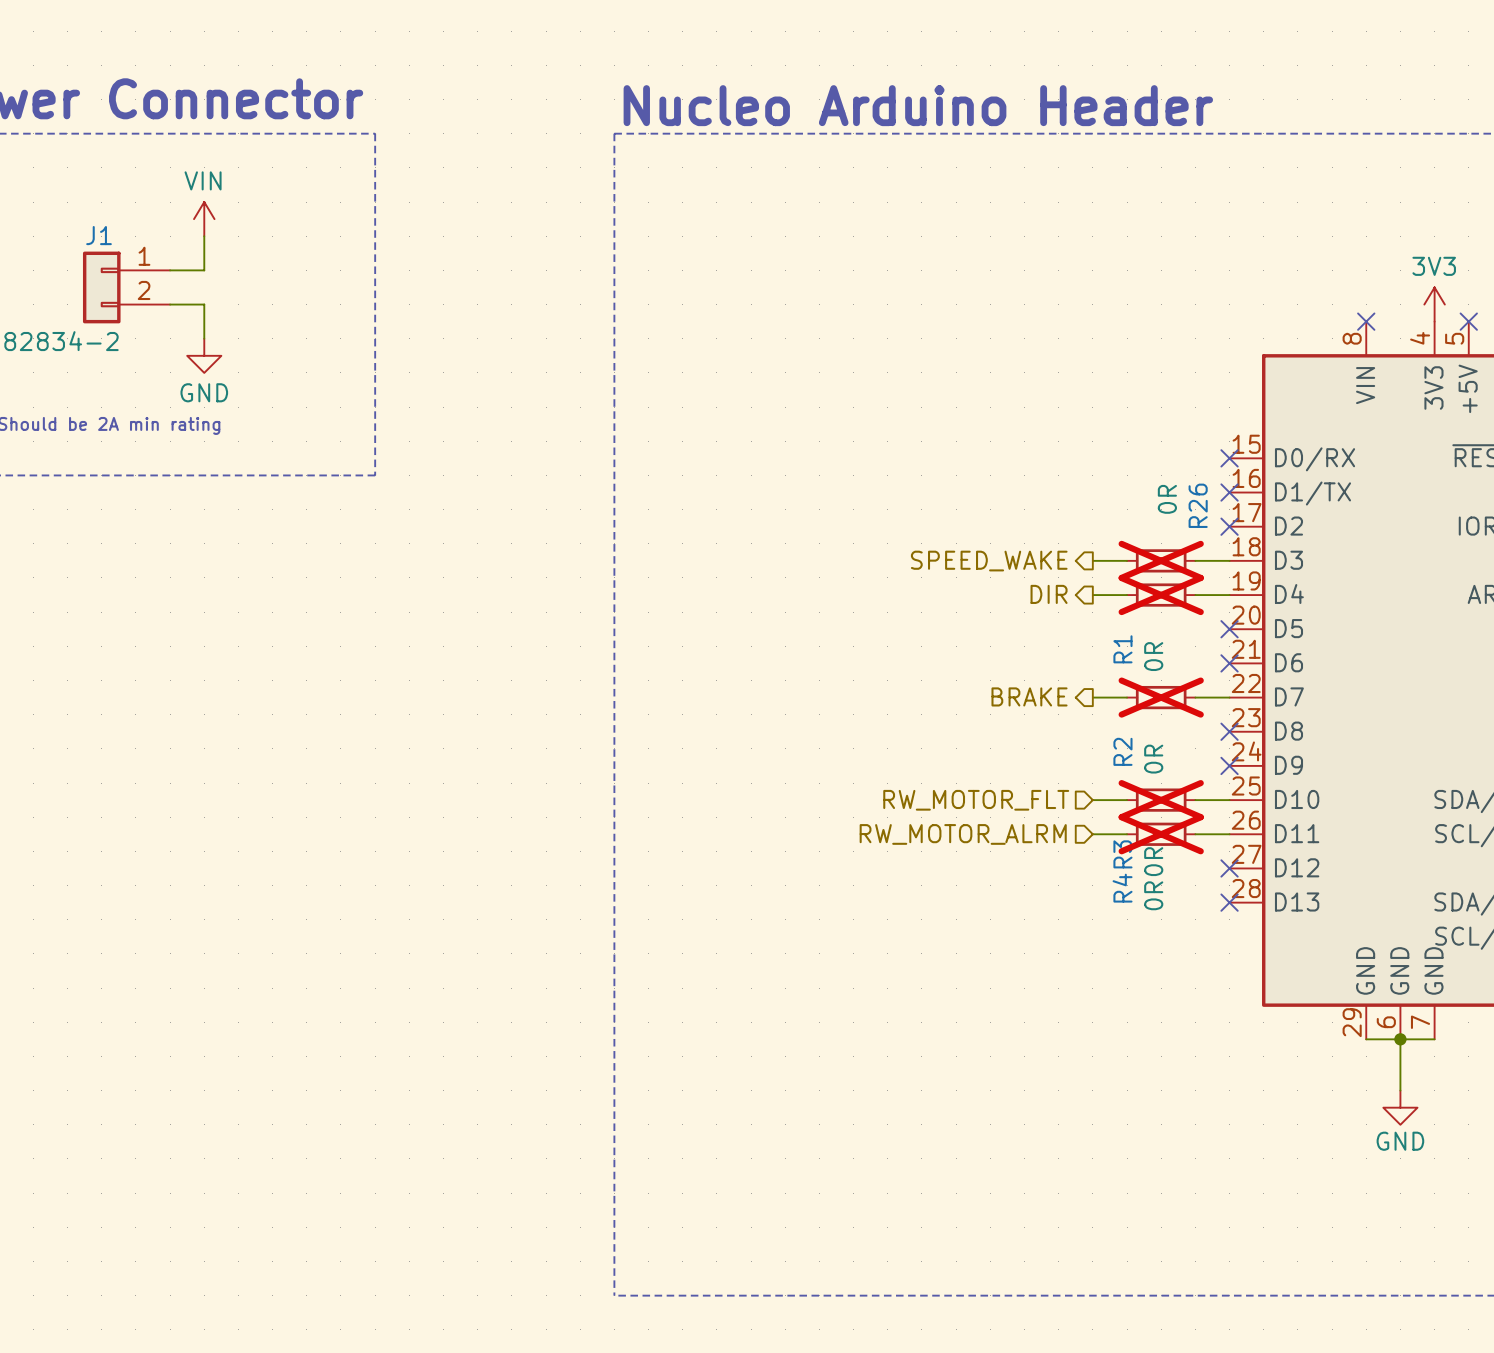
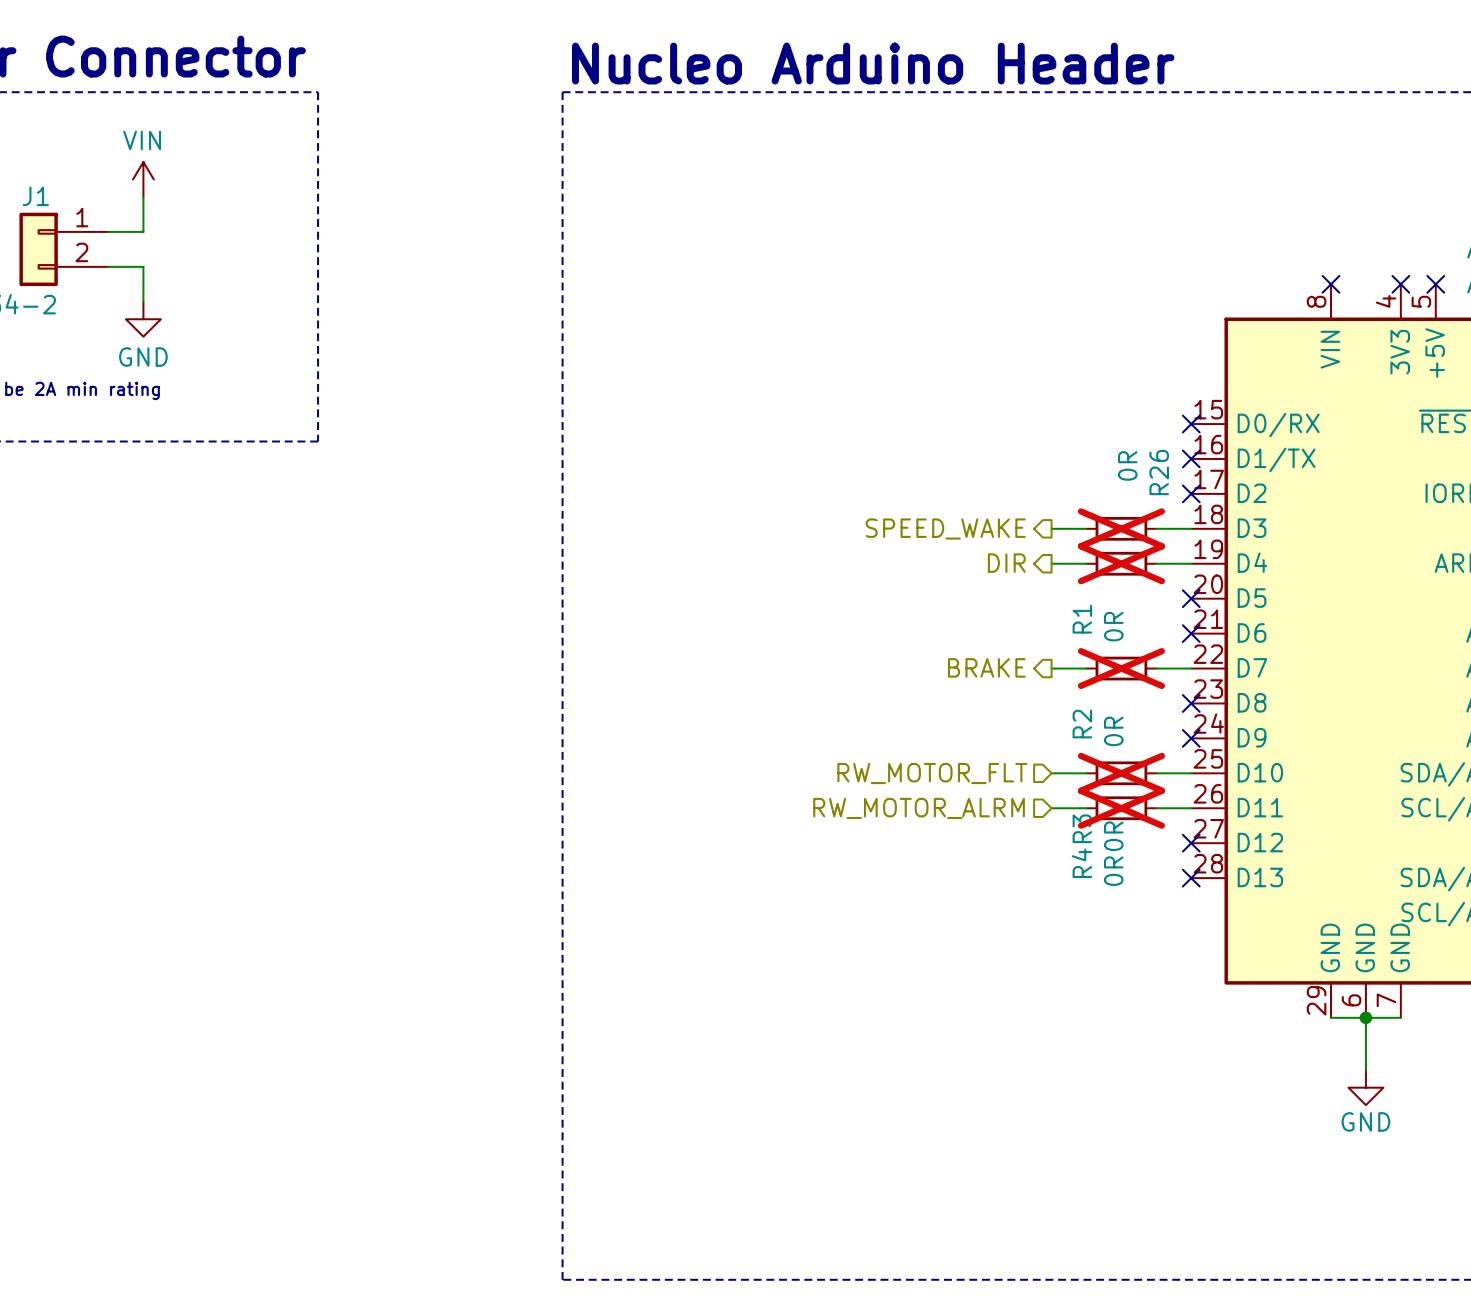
power symbol: 3V3 (1434, 304) -> none
no-connect mark: none -> (1400, 284)

